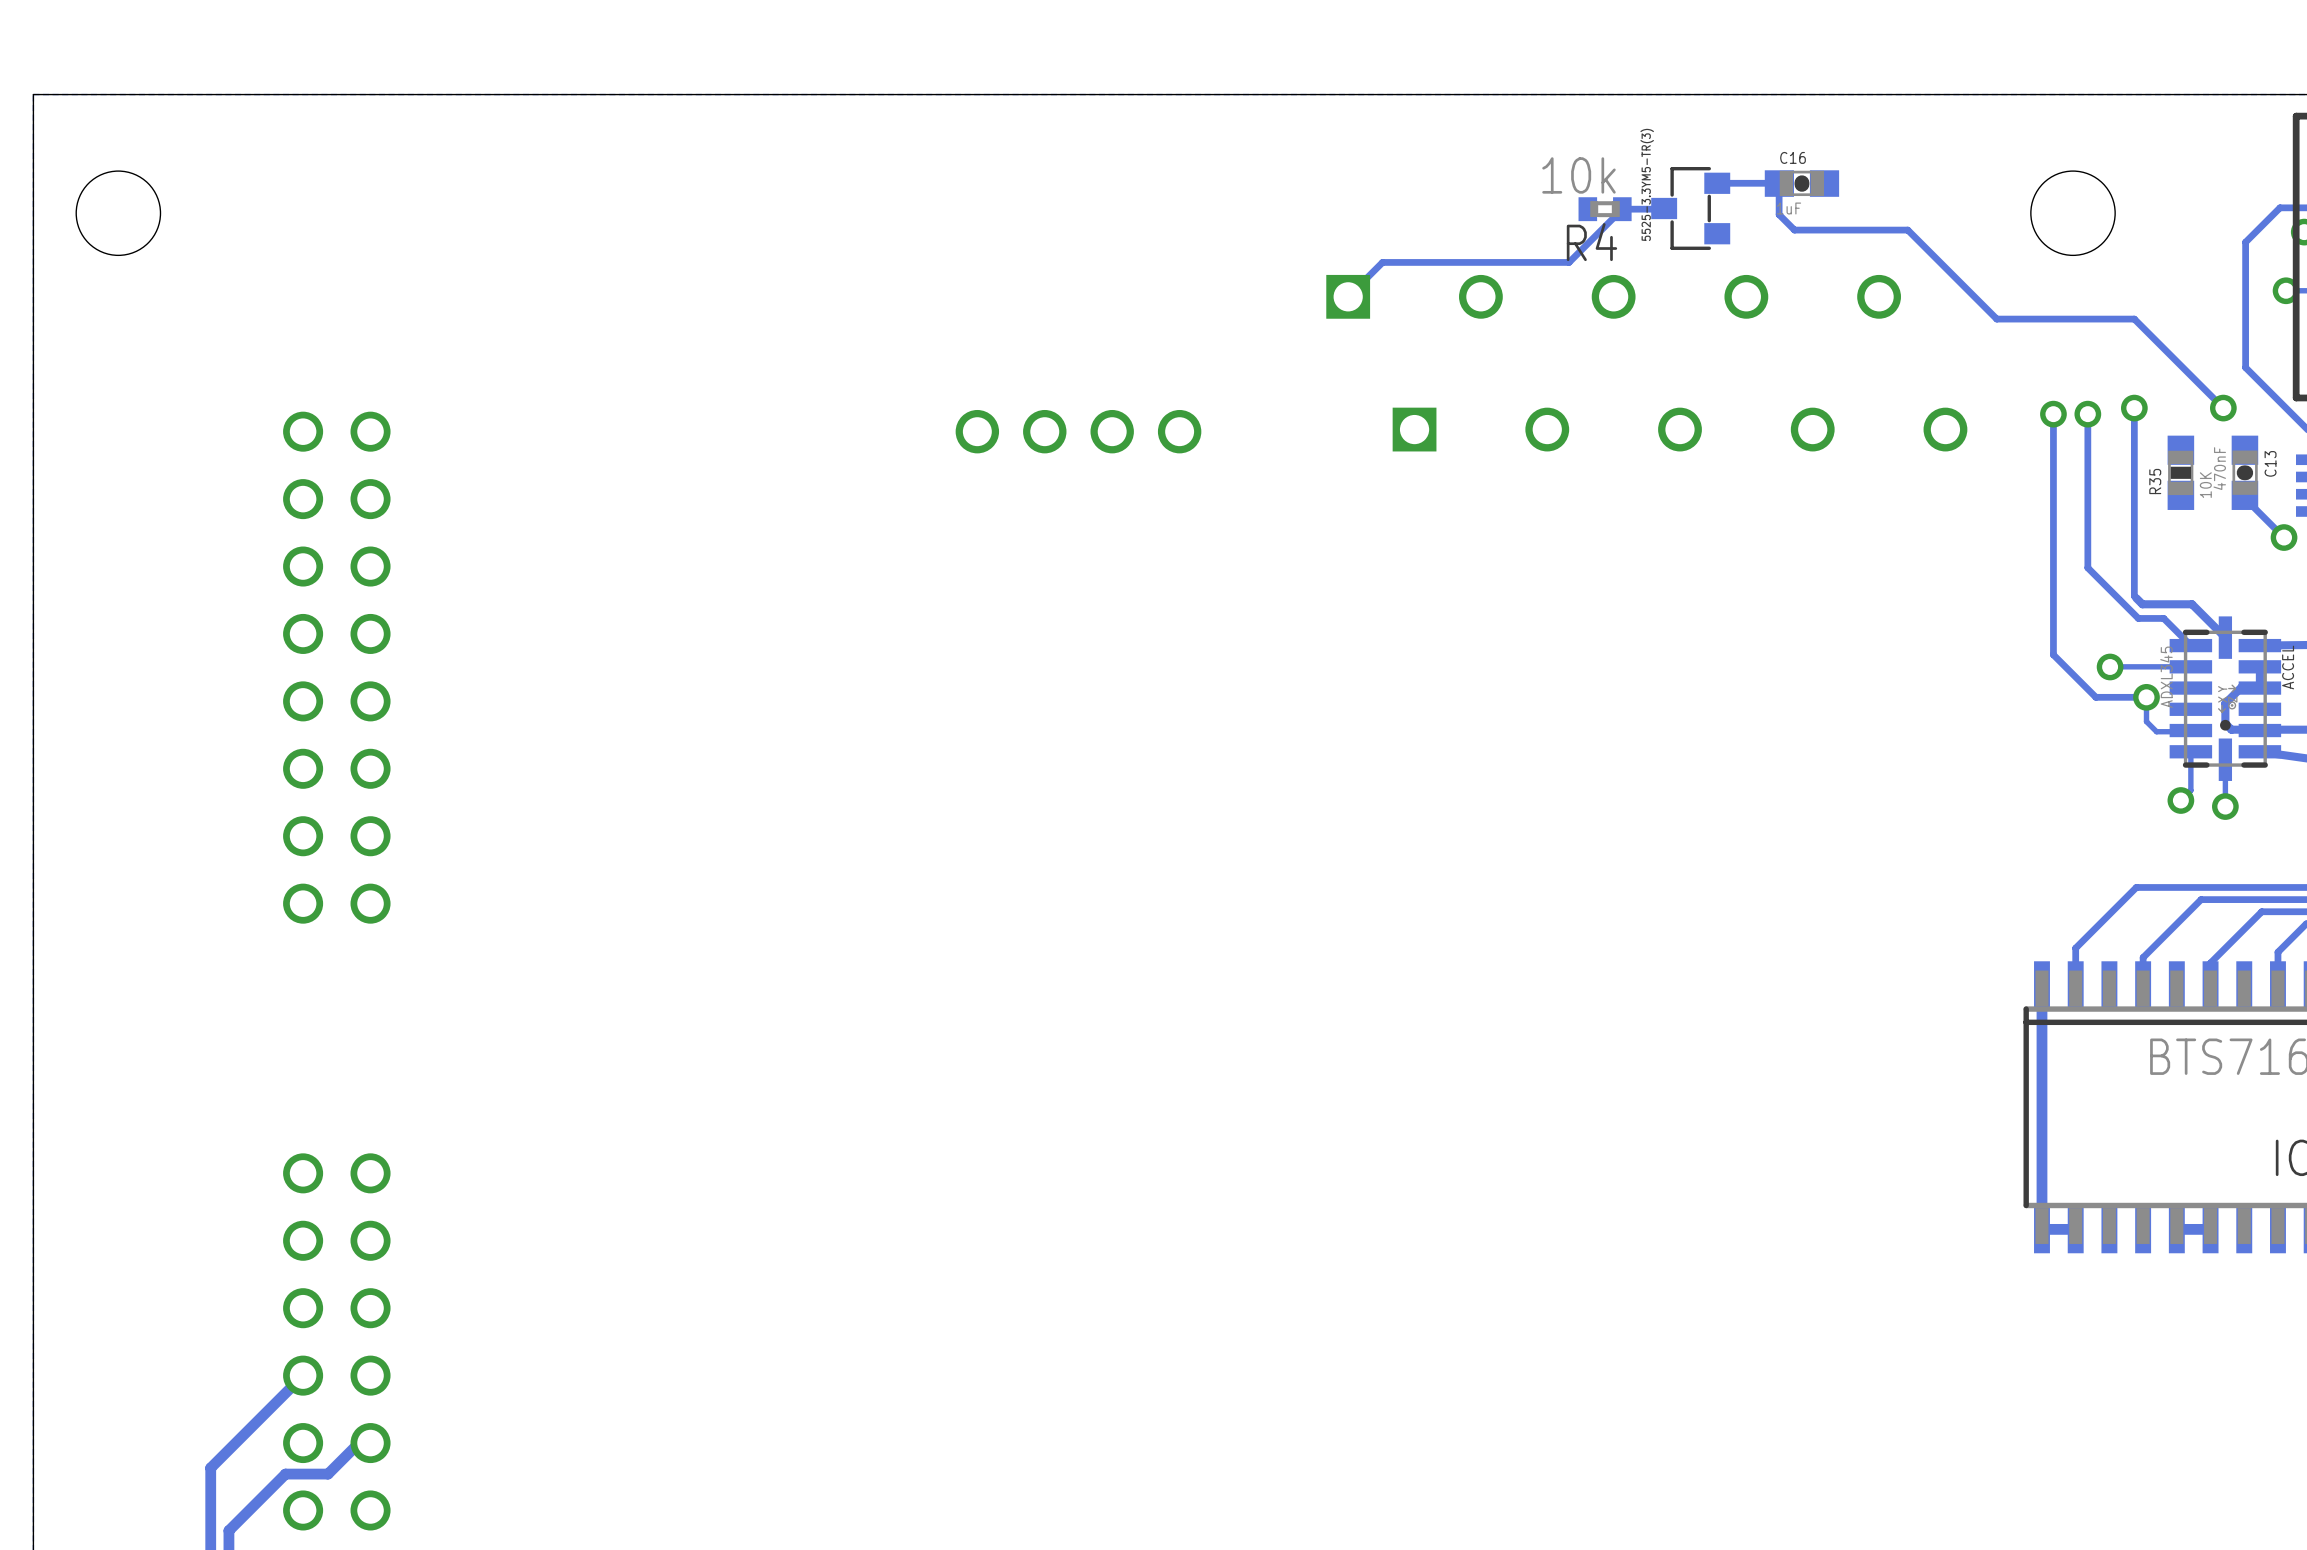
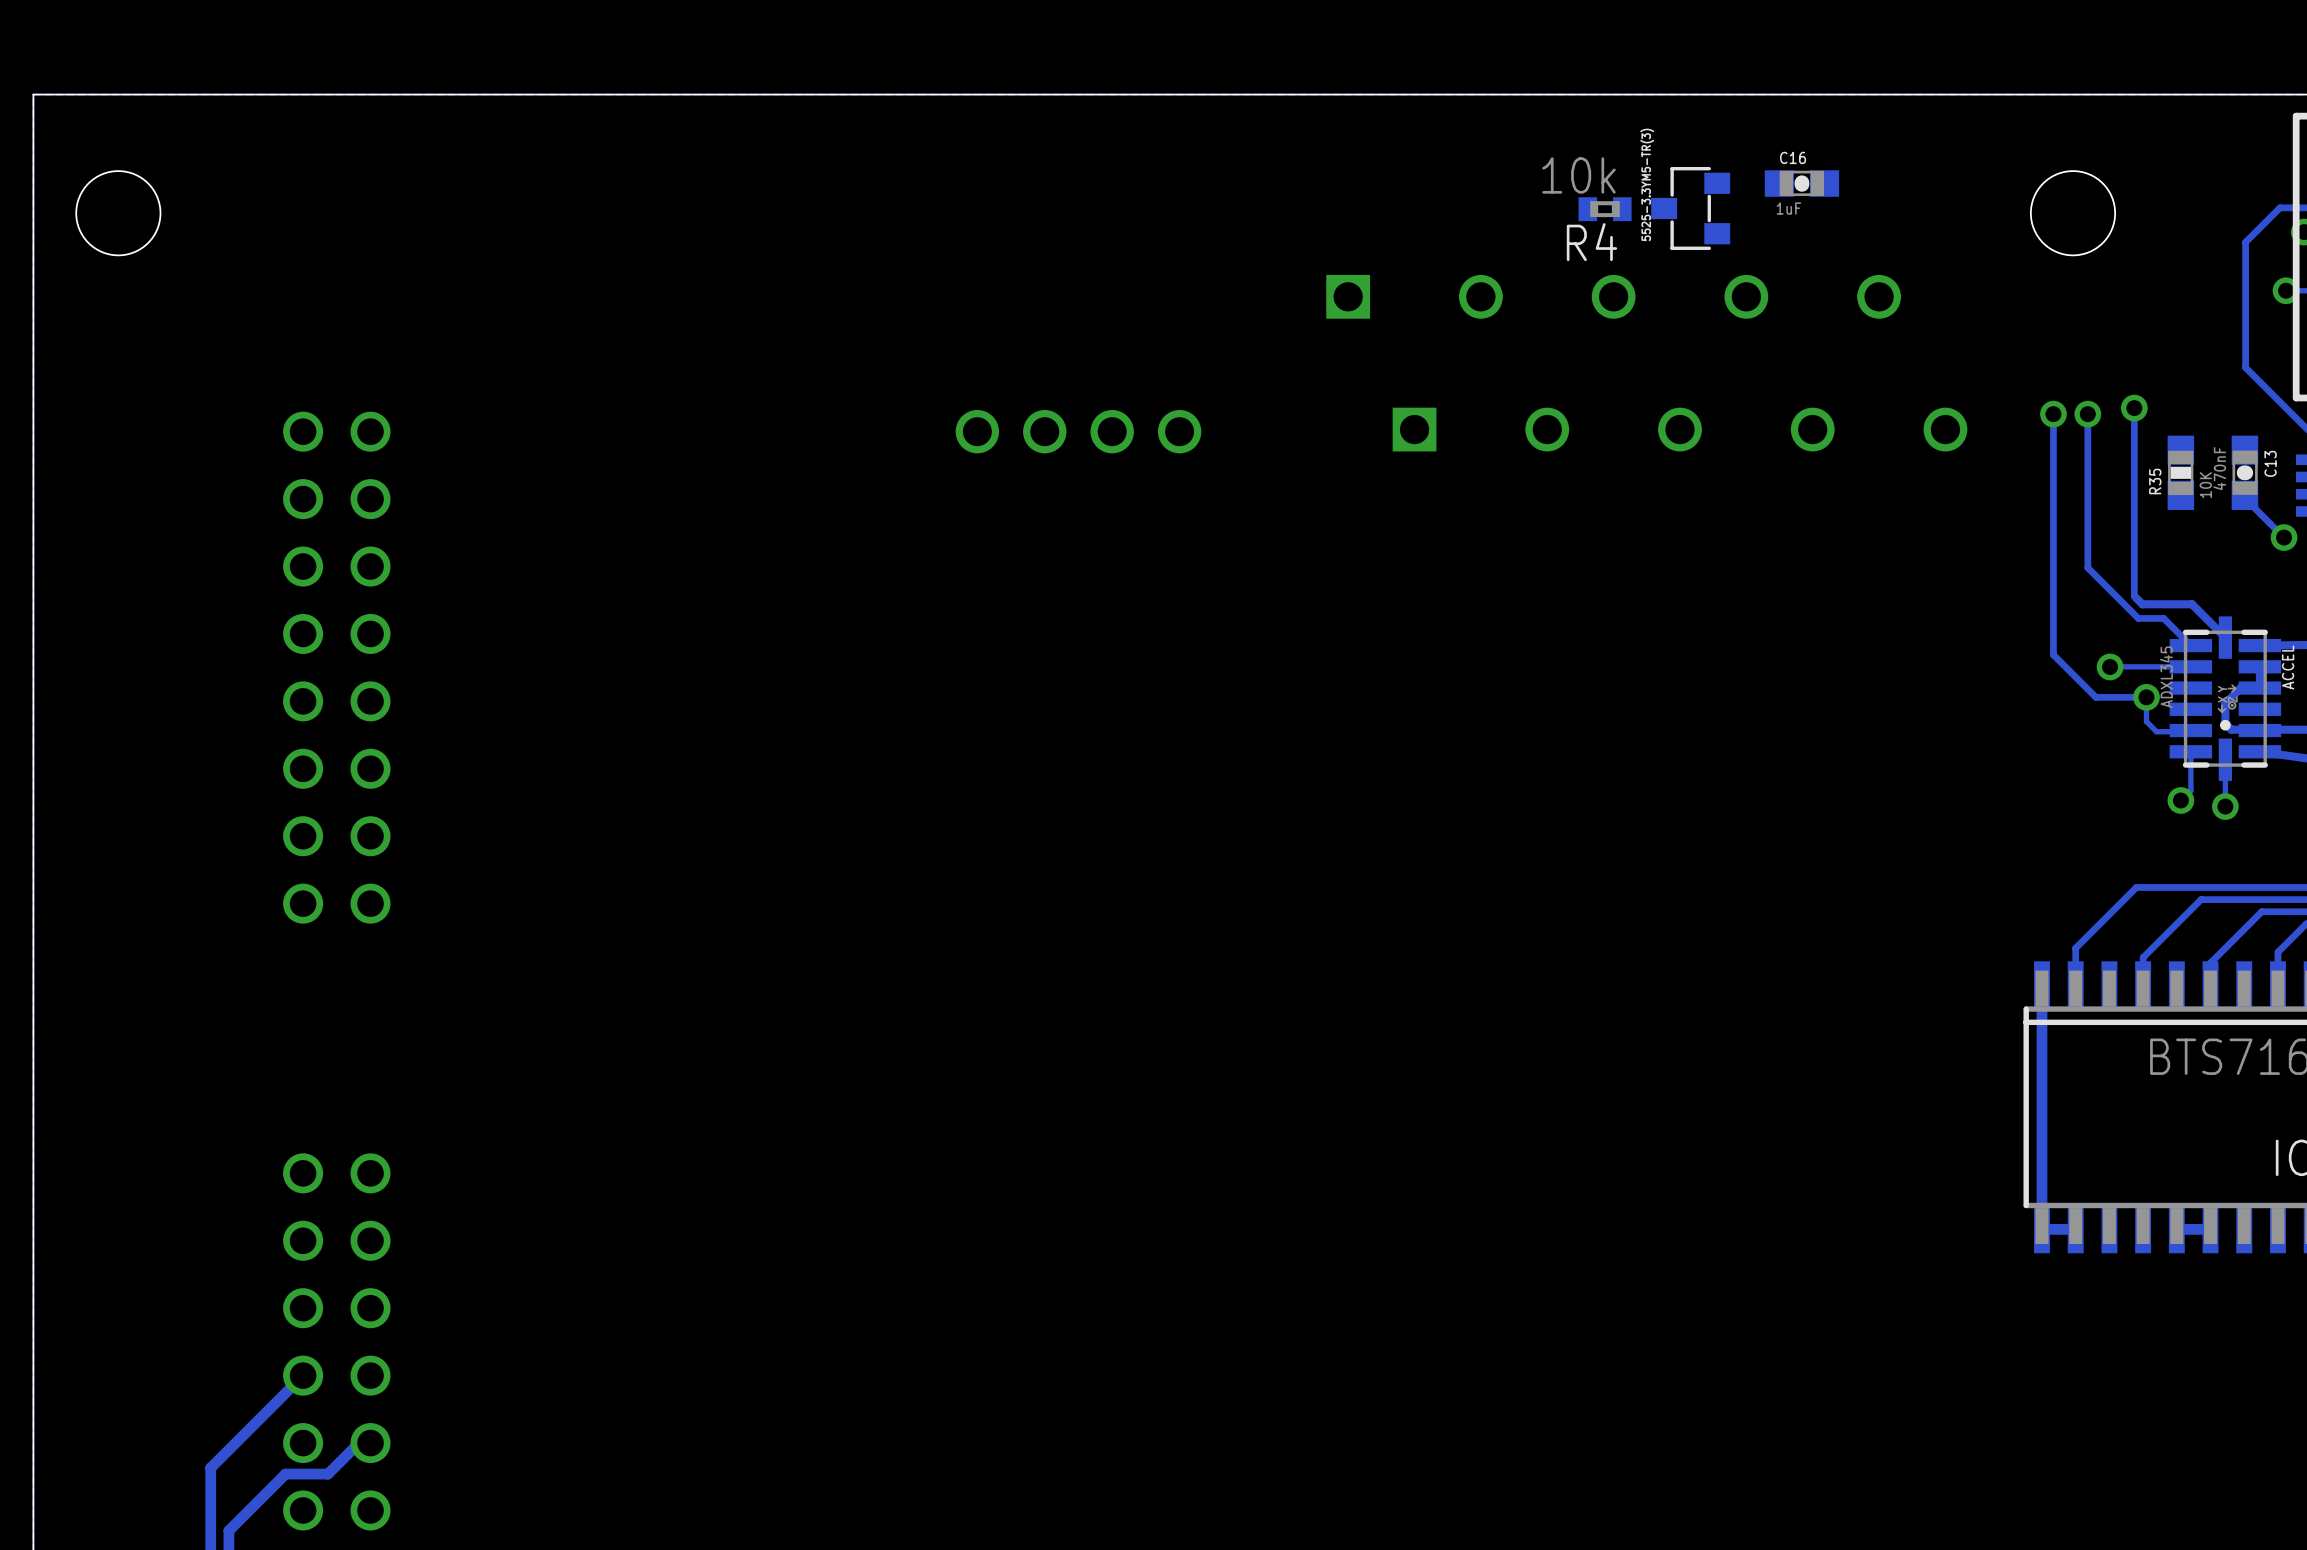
track: (1717, 183) (1779, 183) (1779, 214) (1794, 230) (1907, 230) (1996, 319) (2134, 319) (2223, 408) -> none
track: (1664, 208) (1622, 209) (1569, 262) (1382, 262) (1348, 296) -> none
via: (2223, 408) -> none

